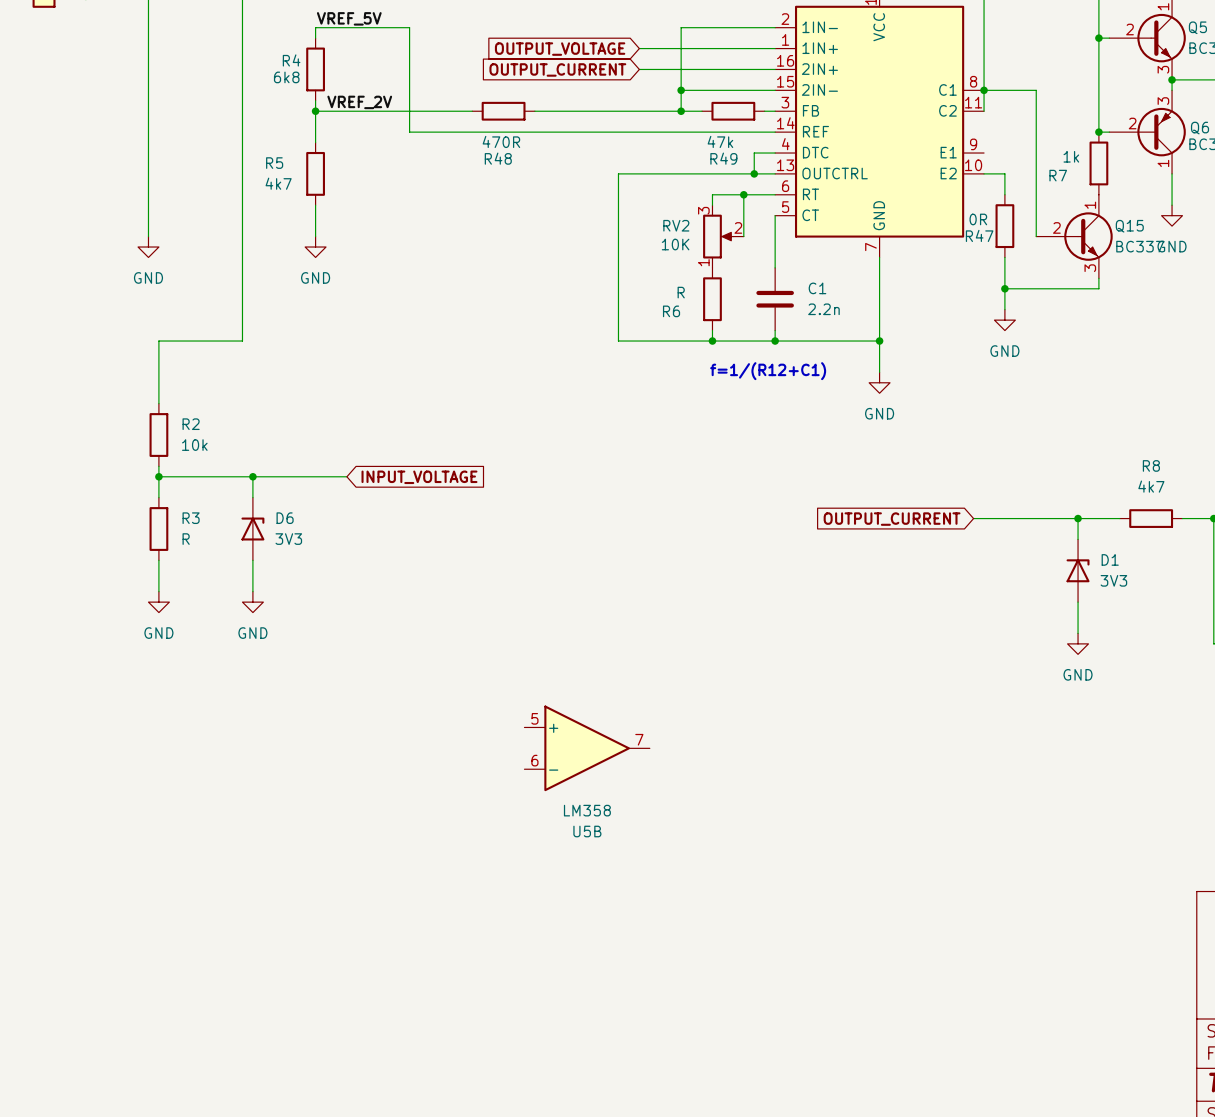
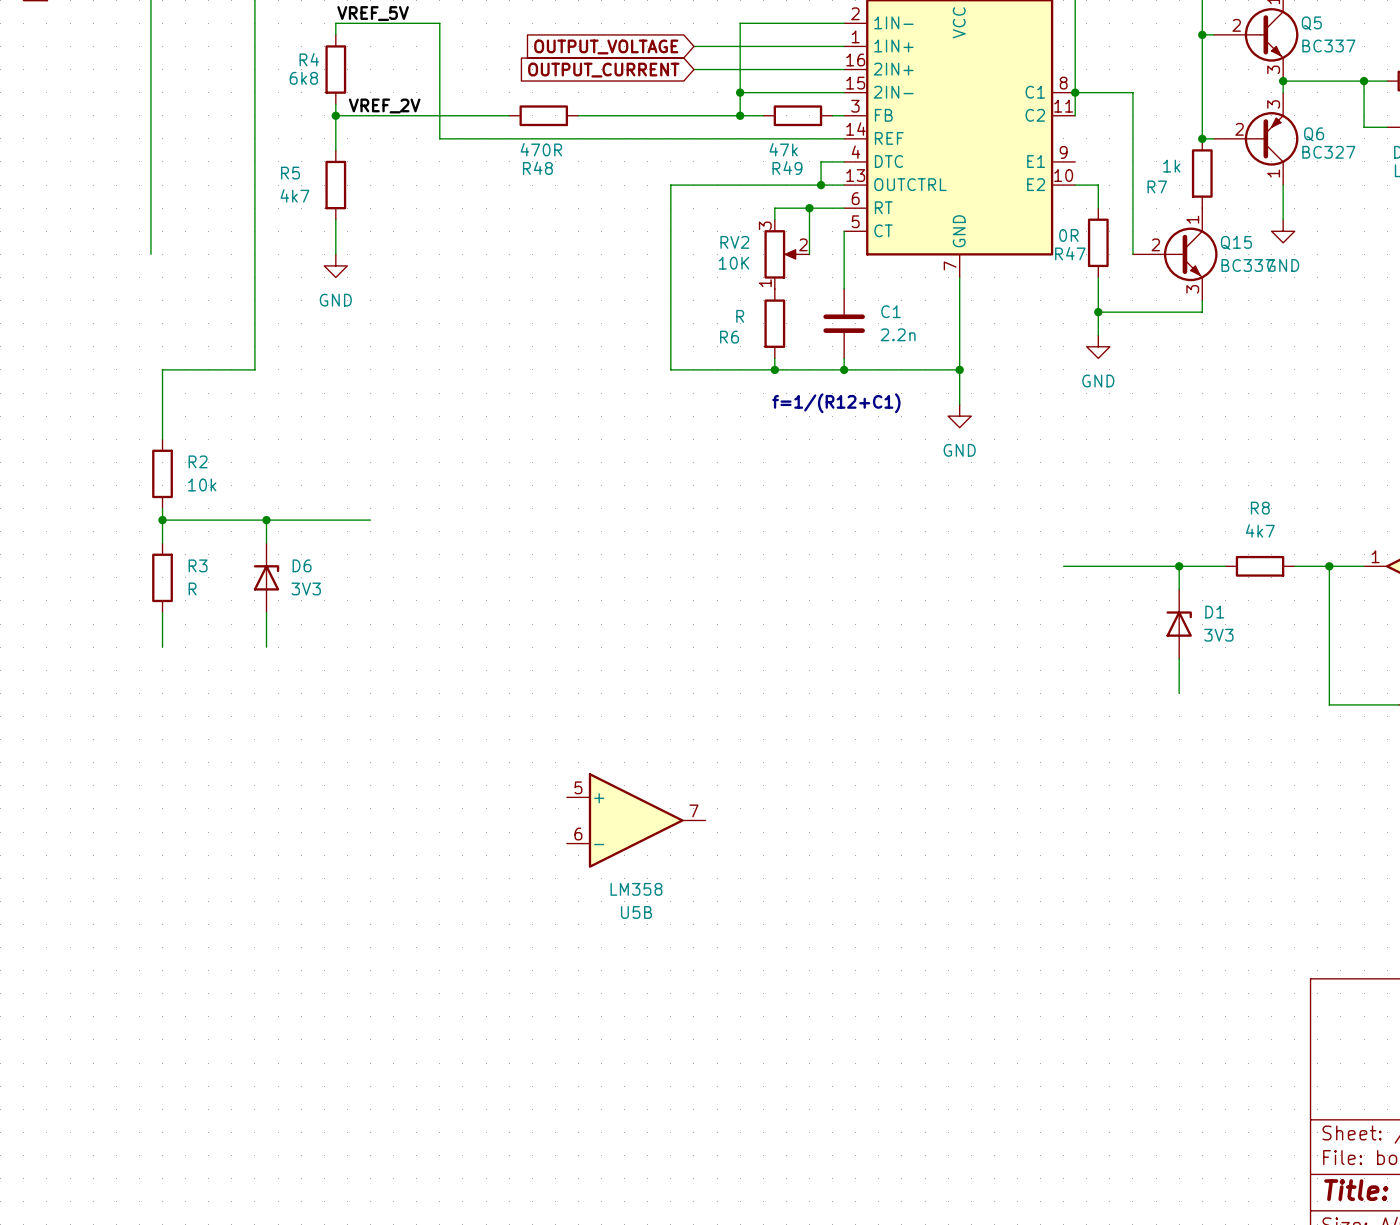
power symbol: GND (148, 247) -> none
global label: INPUT_VOLTAGE (419, 477) -> none
global label: OUTPUT_CURRENT (892, 519) -> none
power symbol: GND (158, 602) -> none
power symbol: GND (252, 602) -> none
power symbol: GND (1078, 643) -> none

